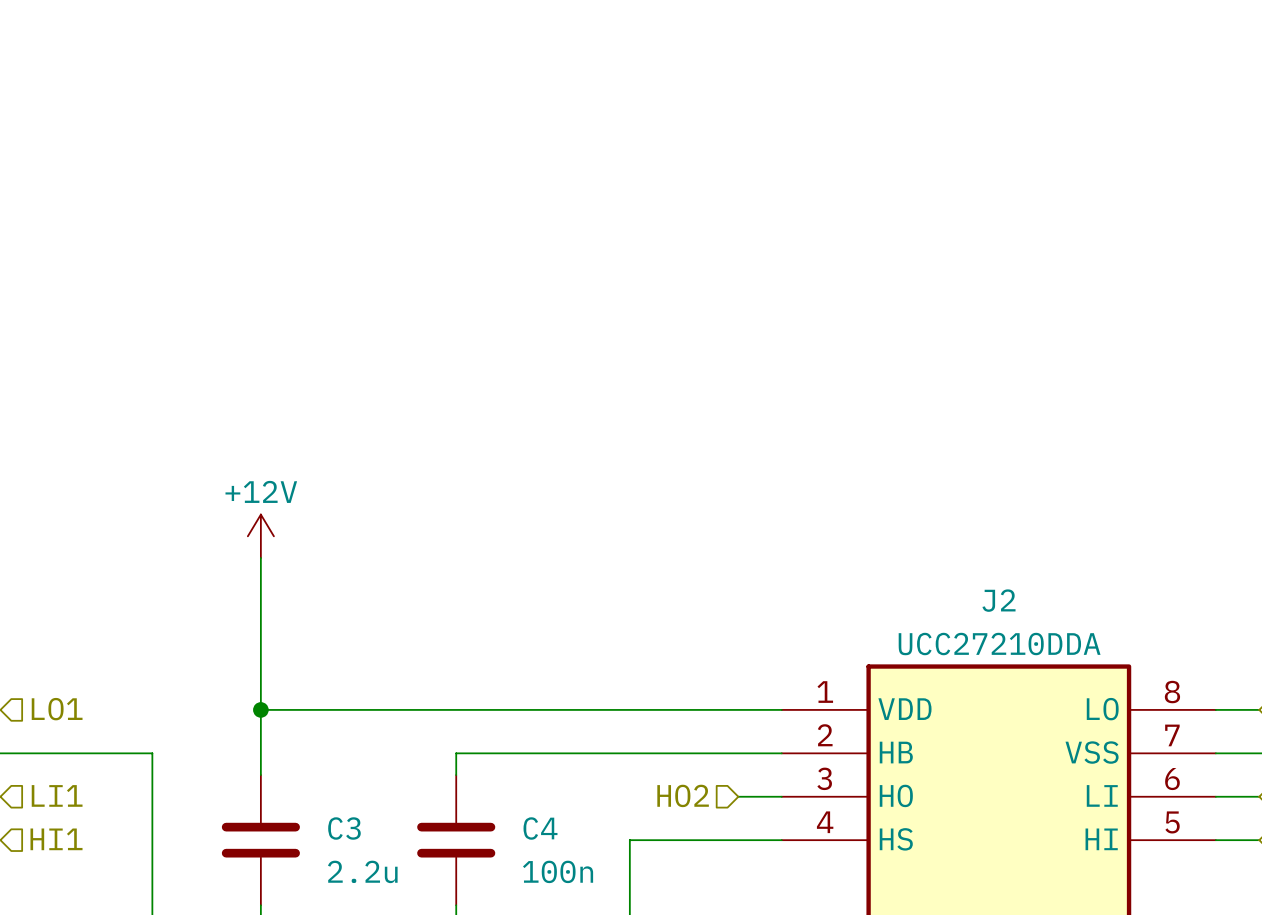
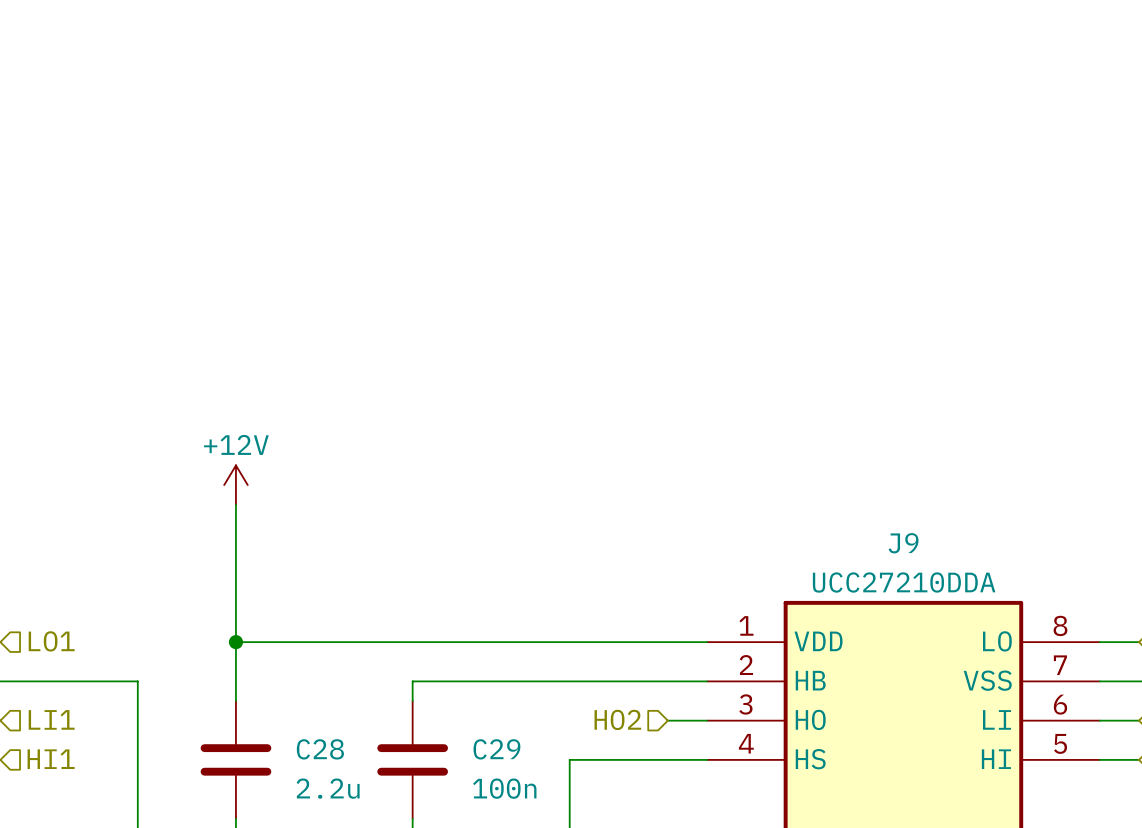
J2 name: J2 (999, 600) -> J9 (903, 543)
C3 name: C3 (344, 828) -> C28 (320, 749)
C4 name: C4 (540, 828) -> C29 (496, 749)

